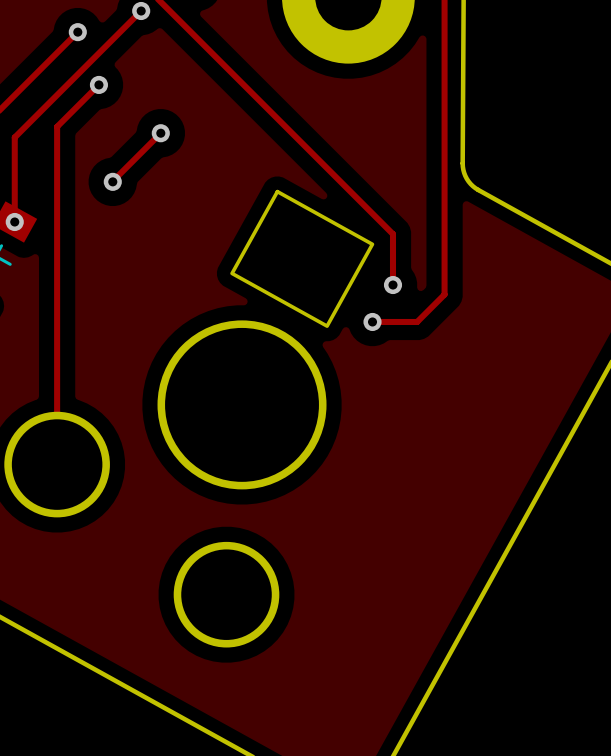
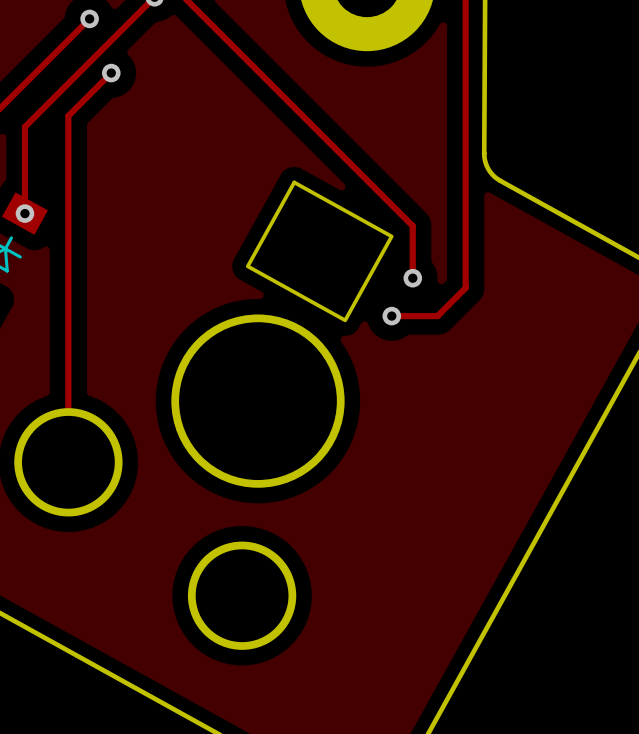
track: (160, 133) (112, 181) -> none
via: (160, 133) -> none
via: (112, 181) -> none

